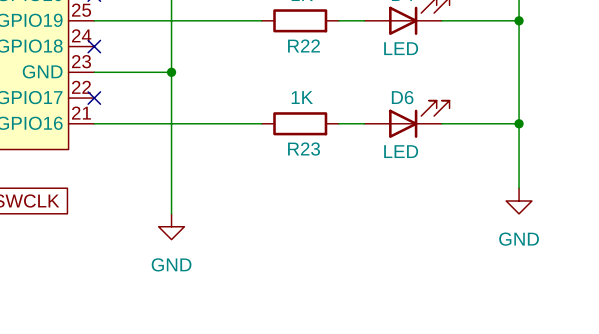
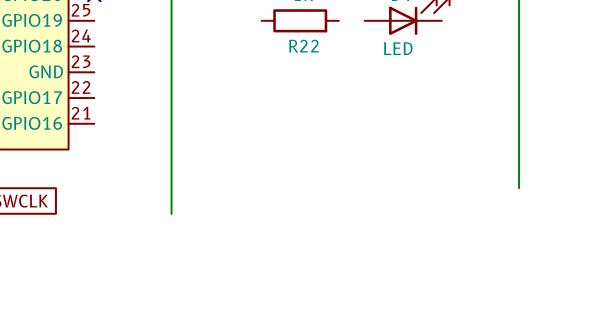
wire: (94, 20) (261, 20) -> none
wire: (338, 20) (364, 20) -> none
wire: (441, 20) (519, 20) -> none
junction: (519, 20) -> none
no-connect mark: (94, 46) -> none
wire: (94, 72) (171, 72) -> none
junction: (171, 72) -> none
no-connect mark: (94, 98) -> none
D6: LED (407, 119) -> none
wire: (94, 123) (261, 123) -> none
R23: 1K (300, 123) -> none
wire: (338, 123) (364, 123) -> none
wire: (441, 123) (519, 123) -> none
junction: (519, 123) -> none
power symbol: GND (519, 201) -> none
power symbol: GND (171, 226) -> none

